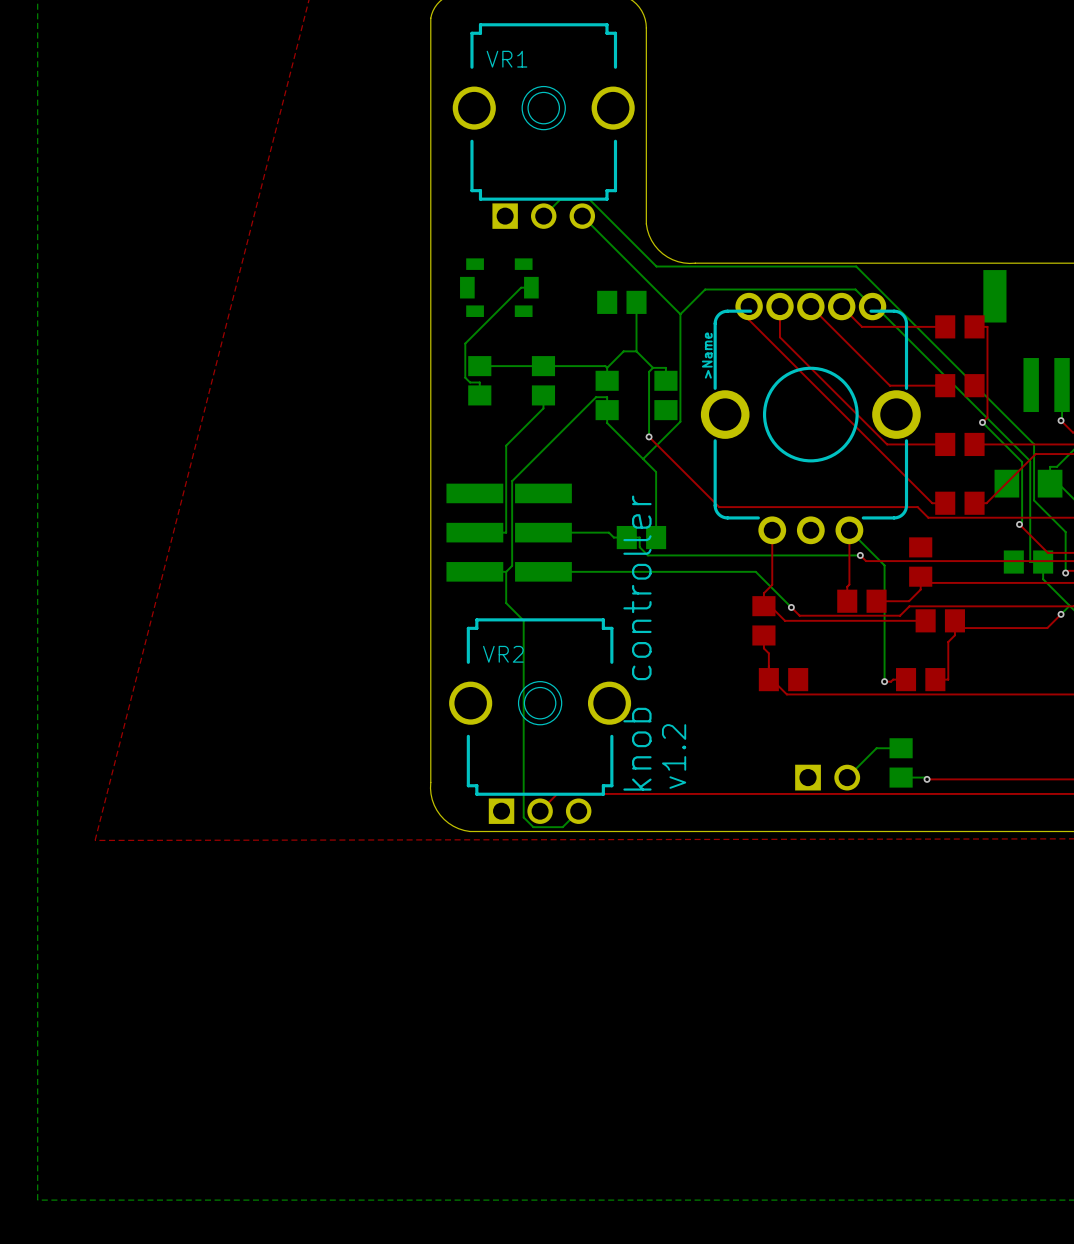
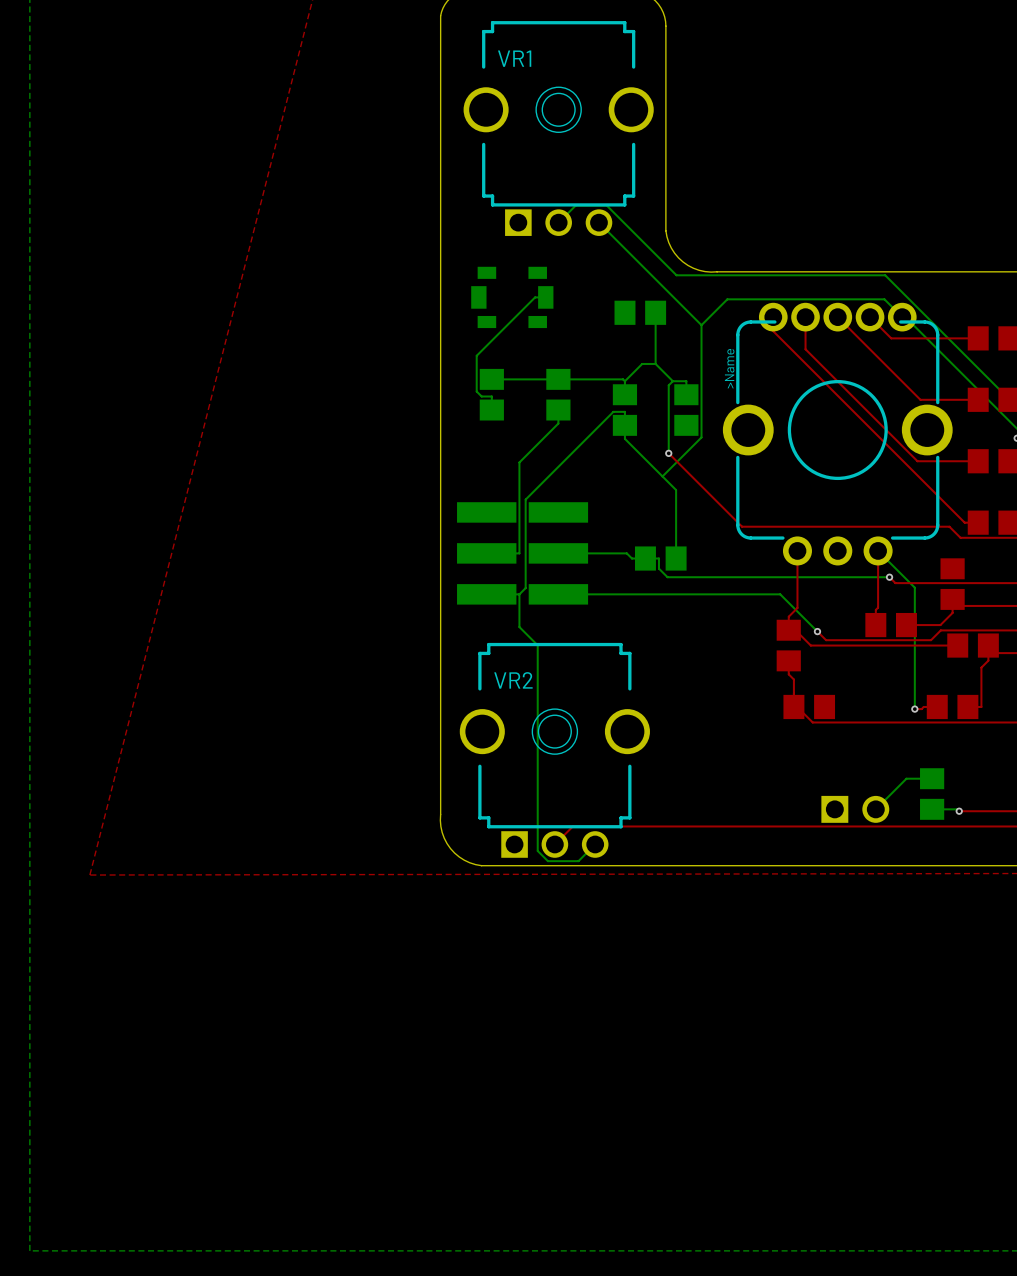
text: knob controller (637, 643) -> none
text: v1.2 (674, 756) -> none

